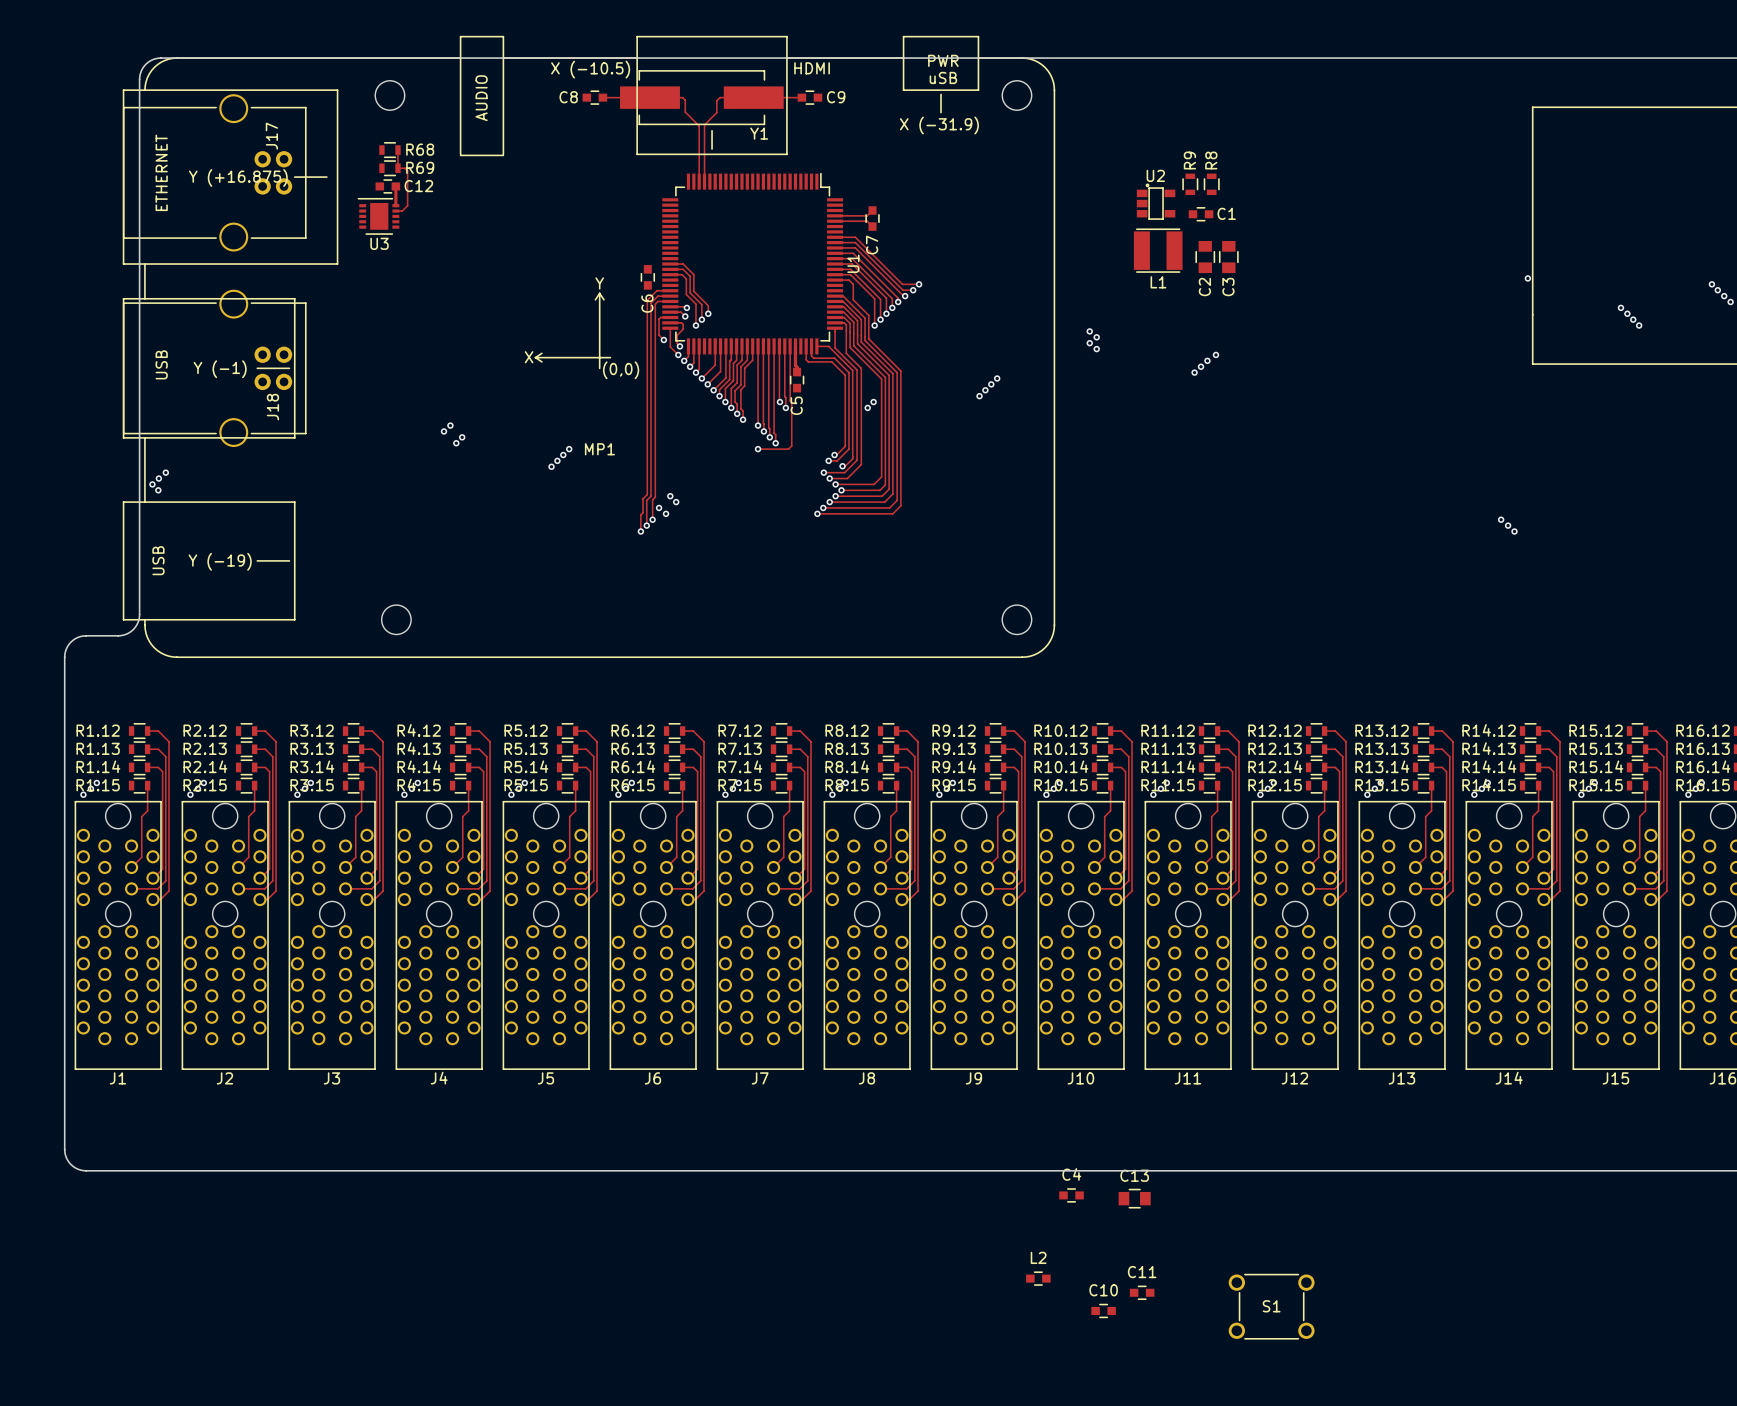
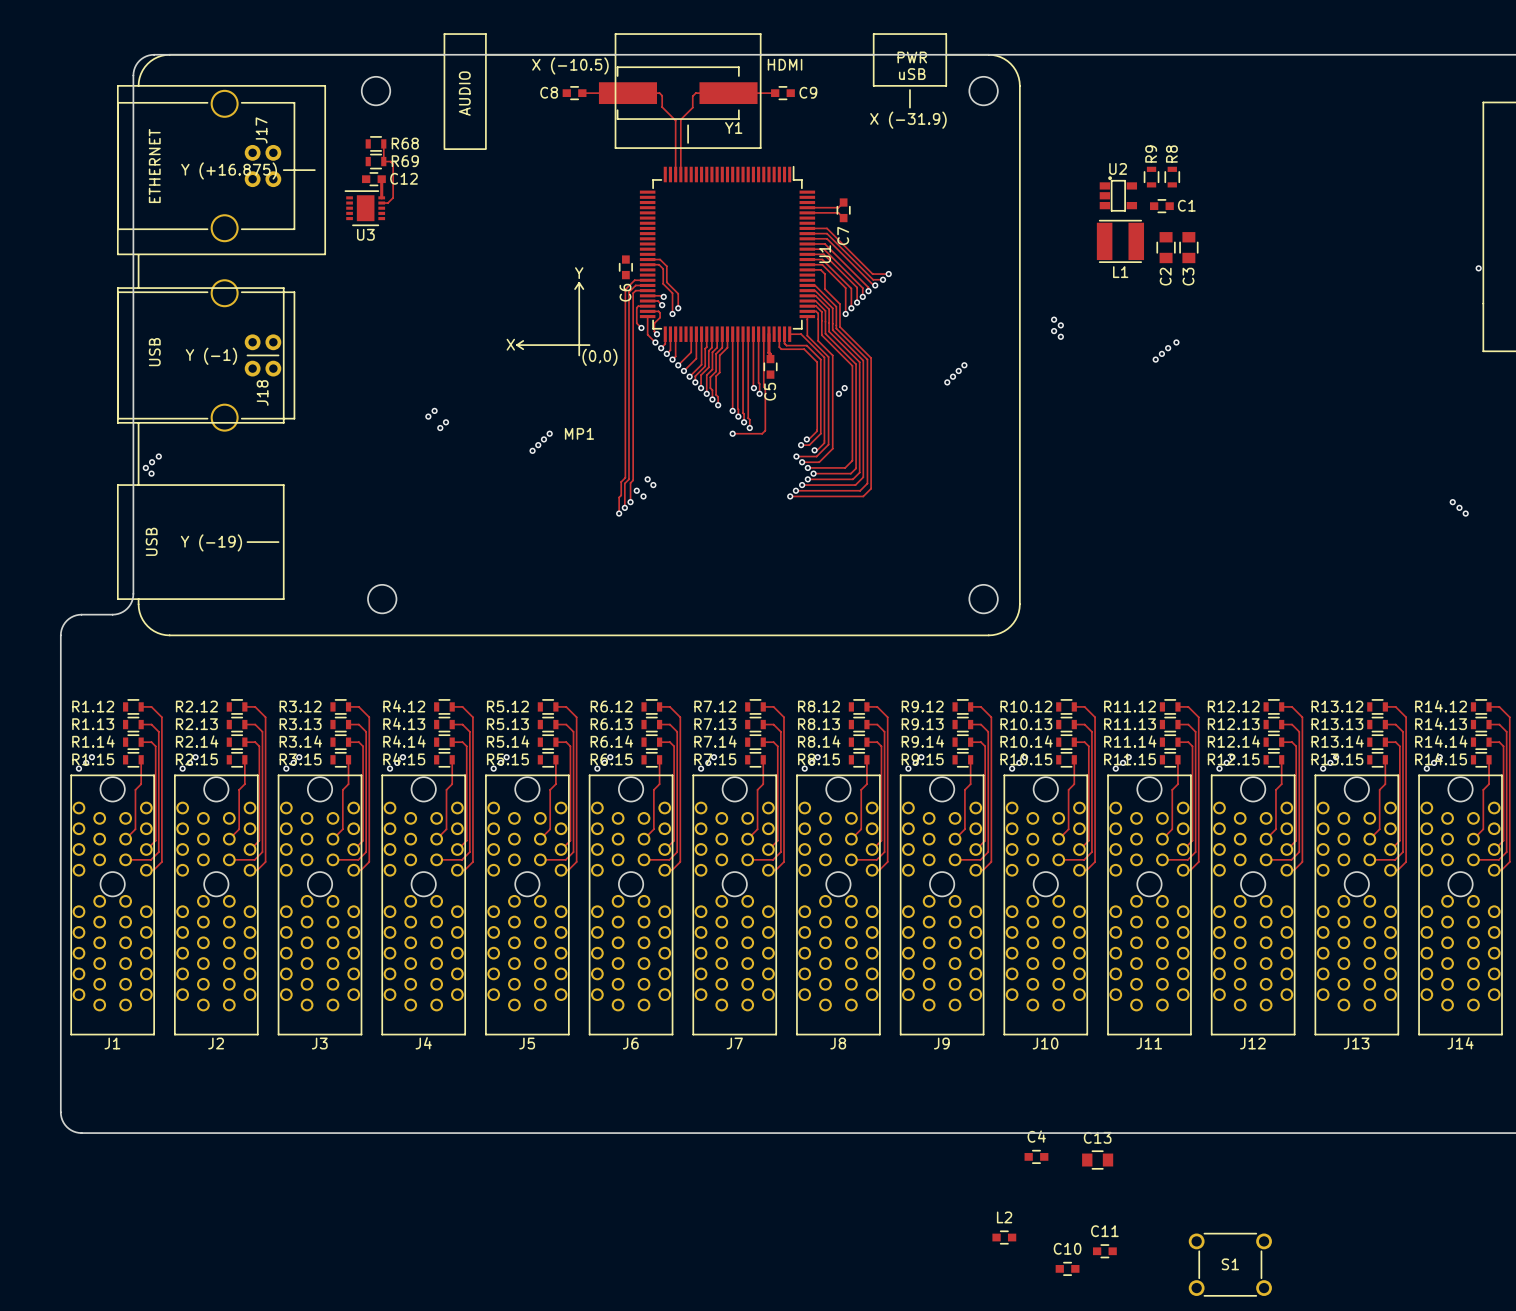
top track: (670, 264) (683, 264) (693, 274) (693, 291) (708, 305) (708, 313) -> none
via: (708, 313) -> none

